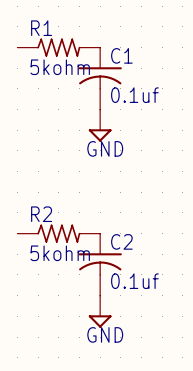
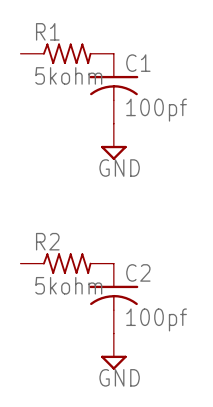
C1 value: 0.1uf (134, 95) -> 100pf (156, 110)
C2 value: 0.1uf (134, 281) -> 100pf (156, 319)

